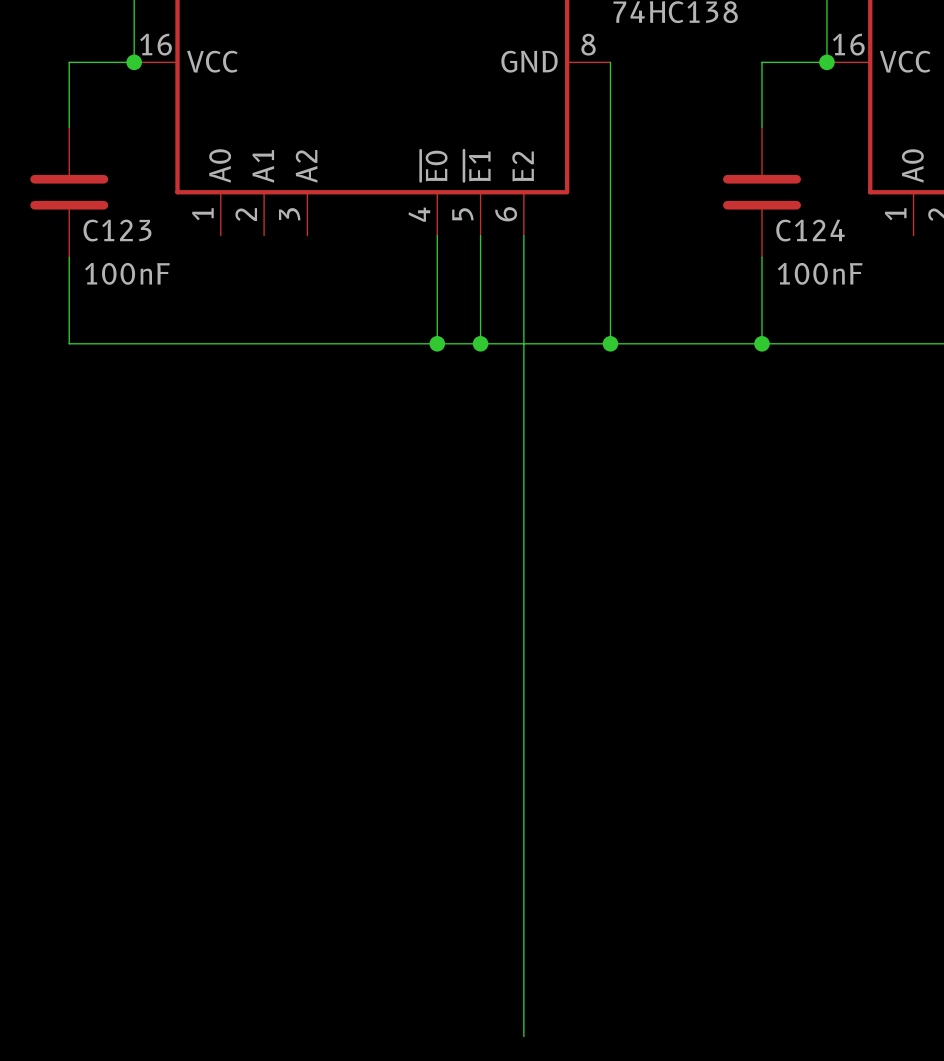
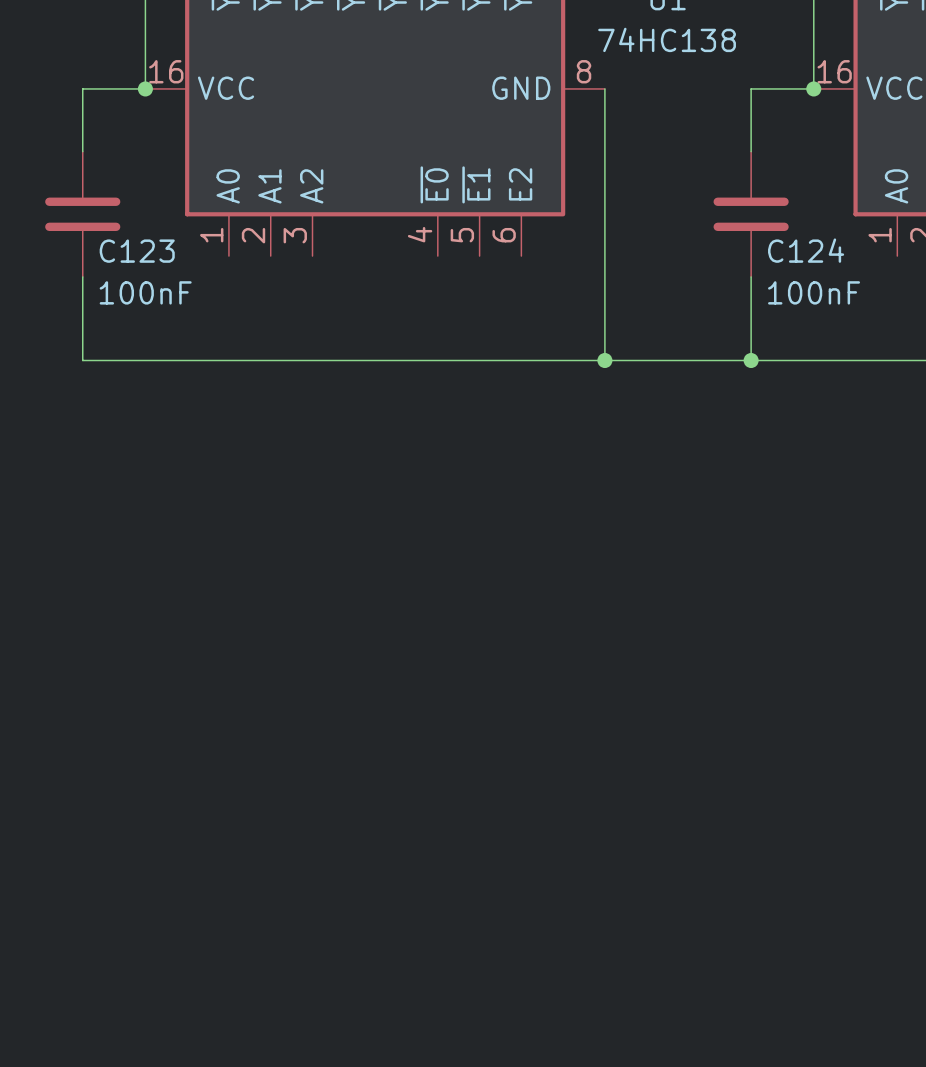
wire: (437, 235) (437, 343) -> none
wire: (480, 235) (480, 343) -> none
wire: (523, 235) (523, 1036) -> none
junction: (437, 343) -> none
junction: (480, 343) -> none

